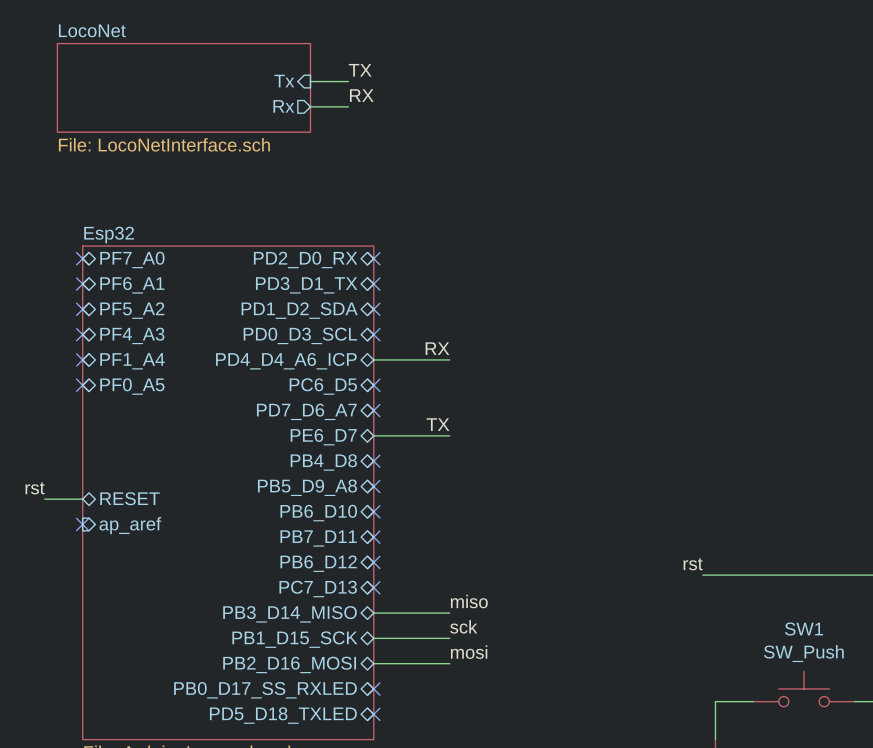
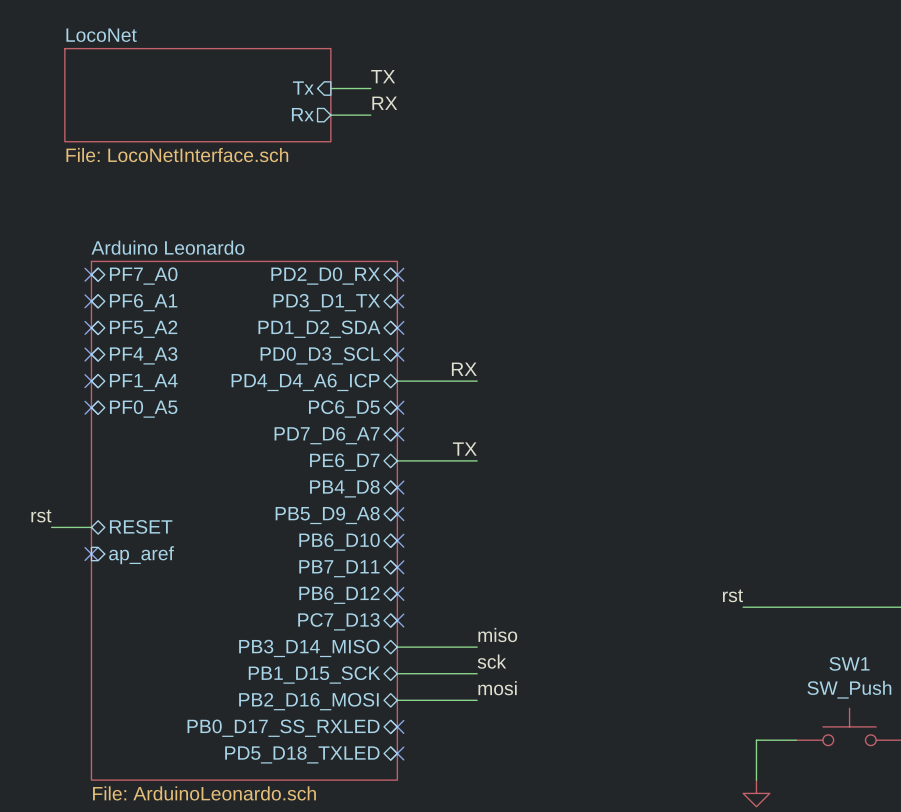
sheet Esp32 name: Esp32 (109, 235) -> Arduino Leonardo (167, 247)

